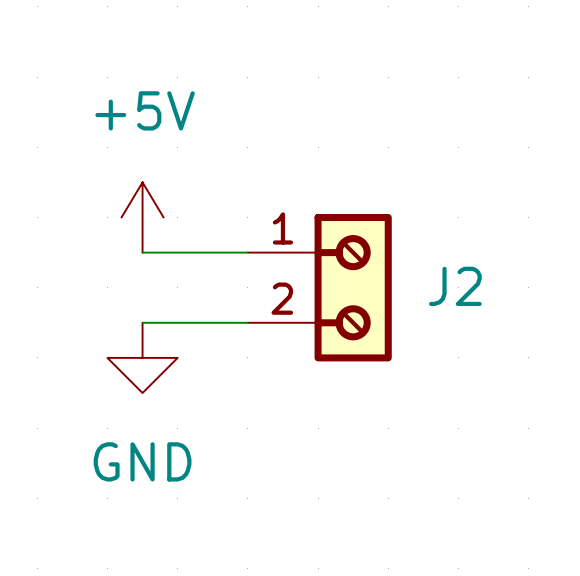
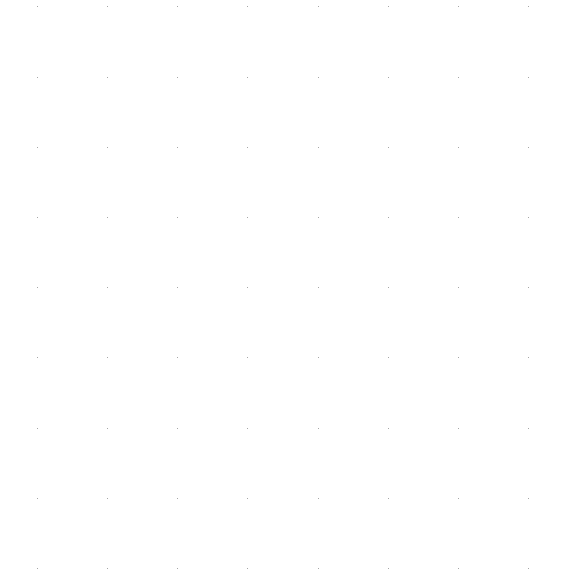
power symbol: +5V (142, 217) -> none
wire: (142, 252) (247, 252) -> none
J2: (319, 287) -> none
wire: (142, 322) (247, 322) -> none
power symbol: GND (142, 357) -> none

